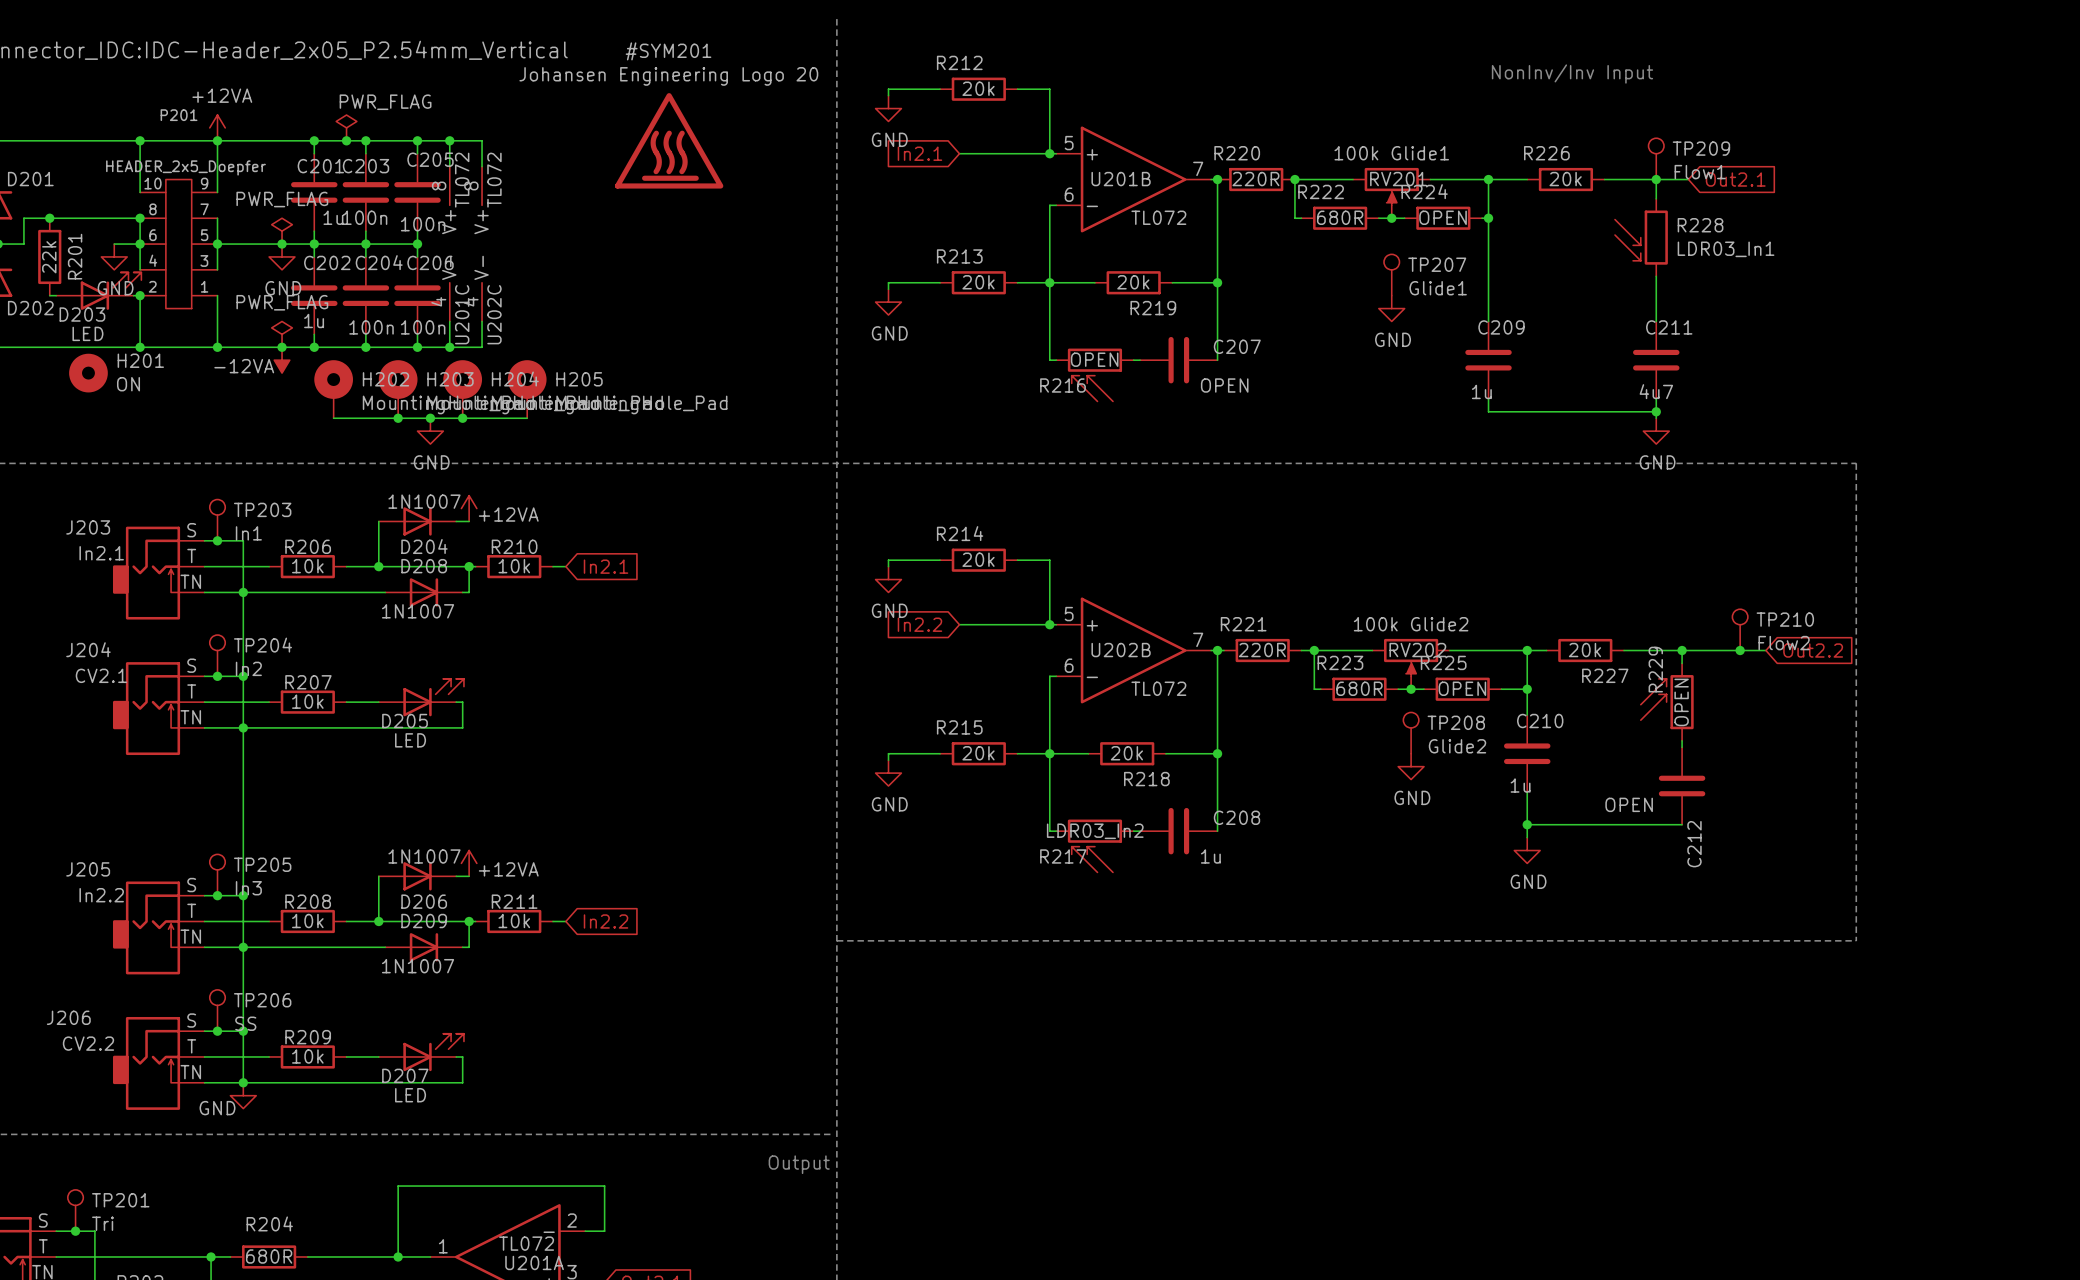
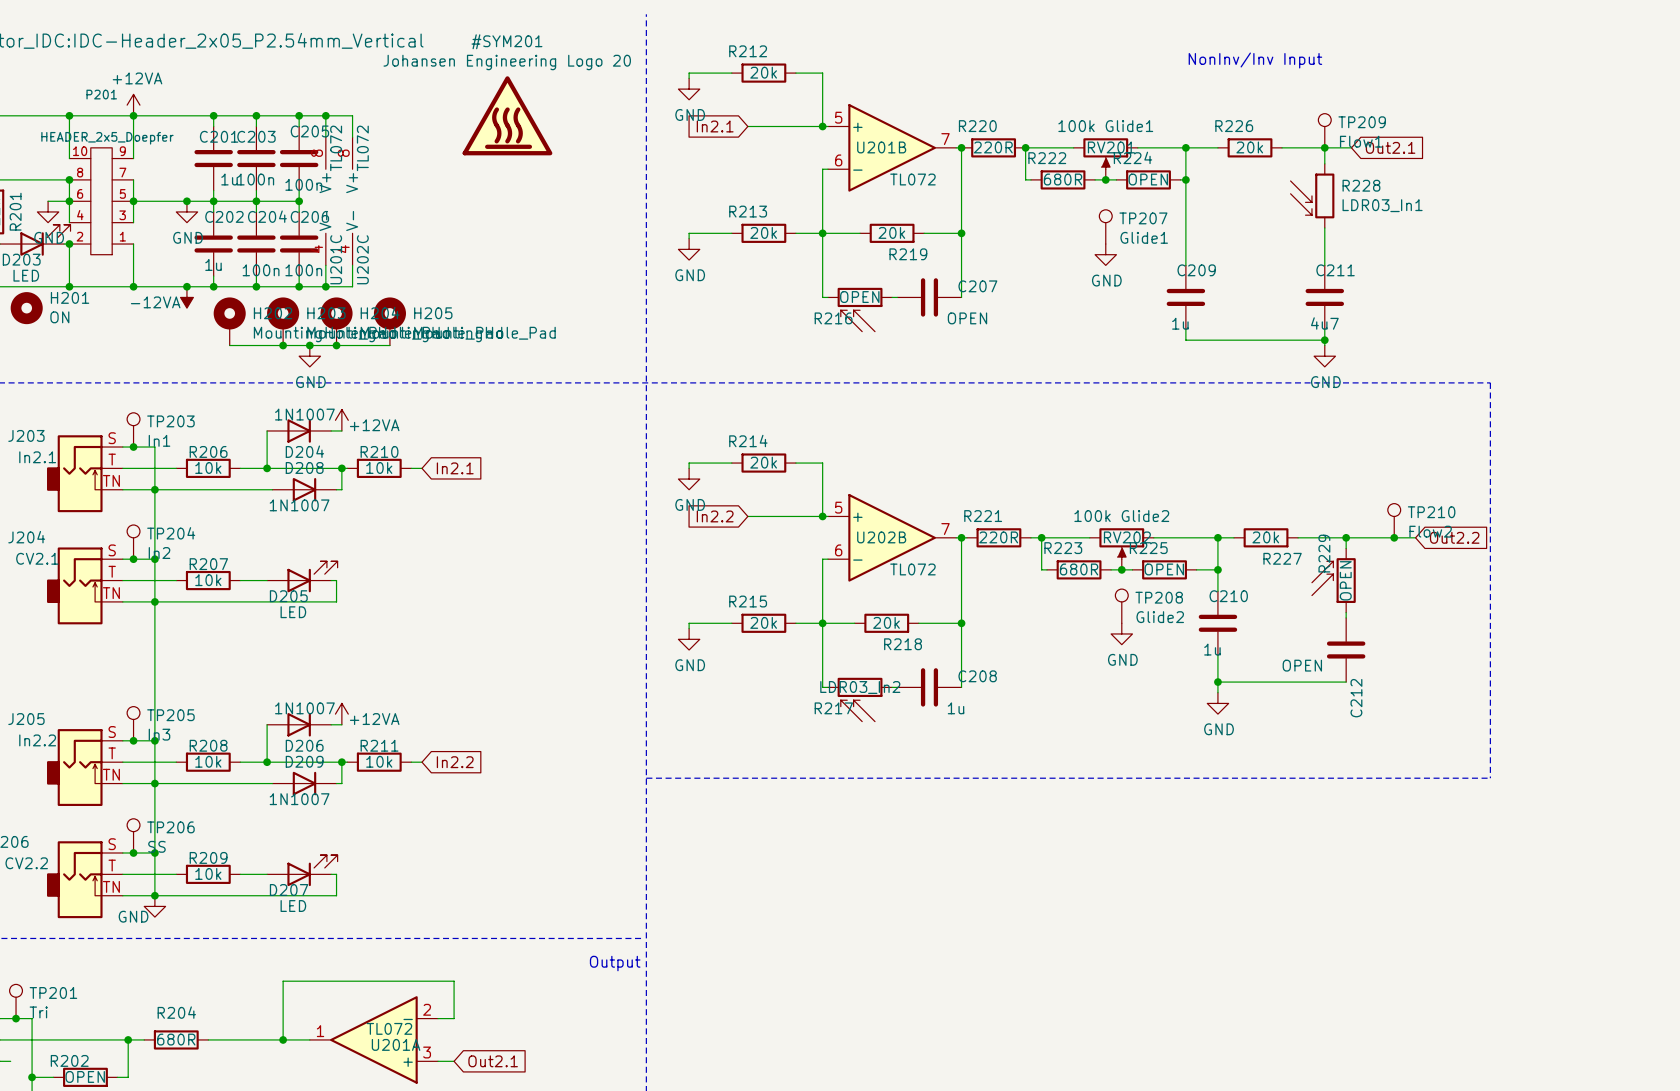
power symbol: PWR_FLAG (346, 127) -> none
junction: (346, 140) -> none
power symbol: PWR_FLAG (282, 231) -> none
power symbol: PWR_FLAG (282, 334) -> none

